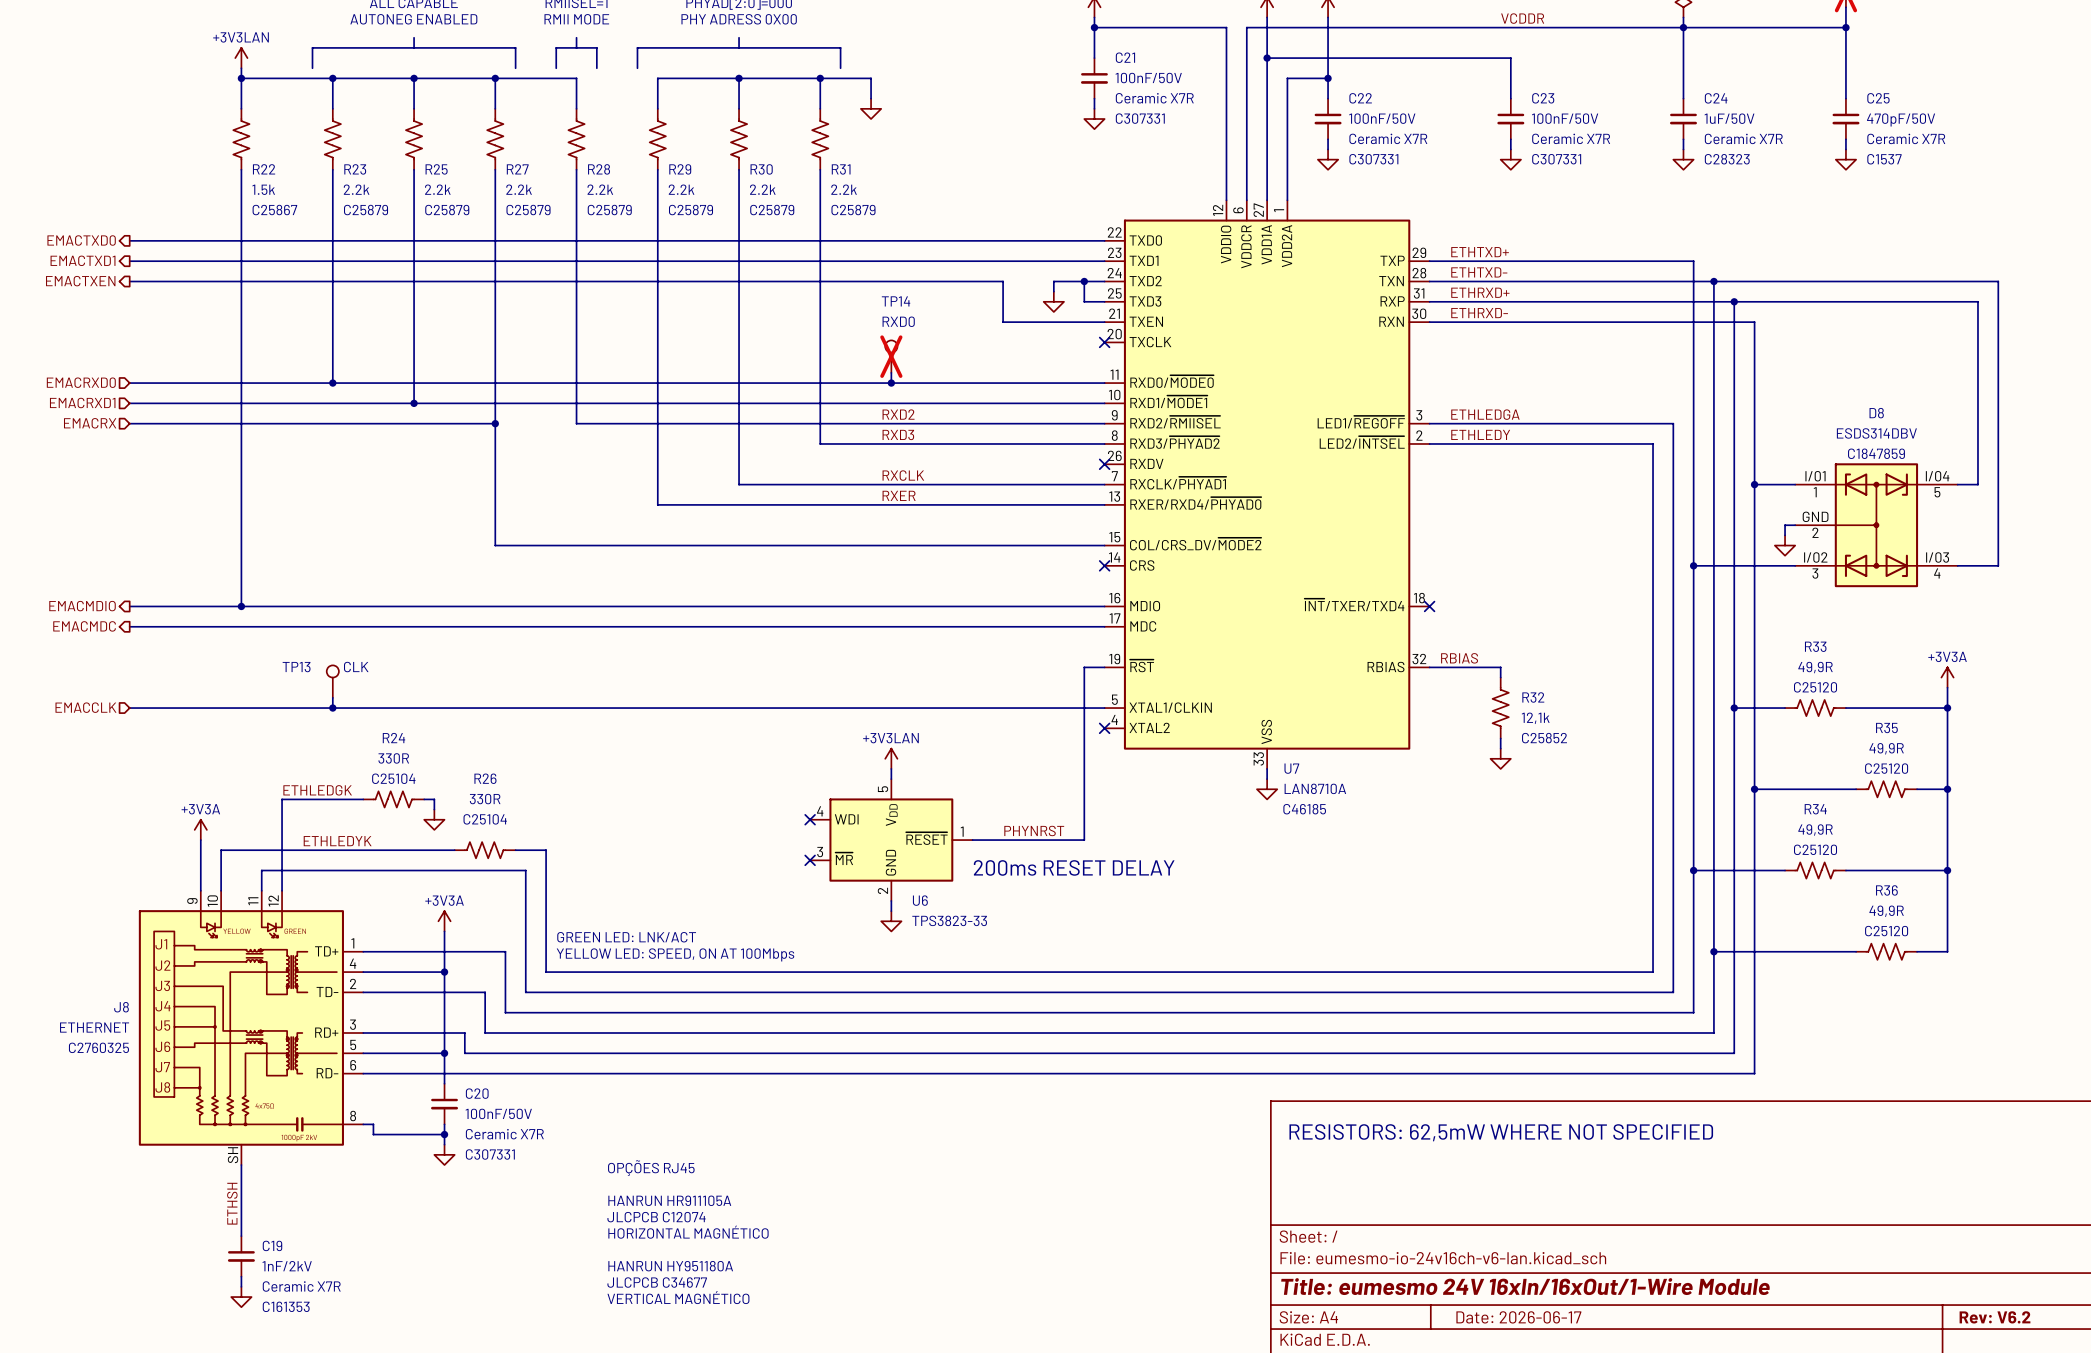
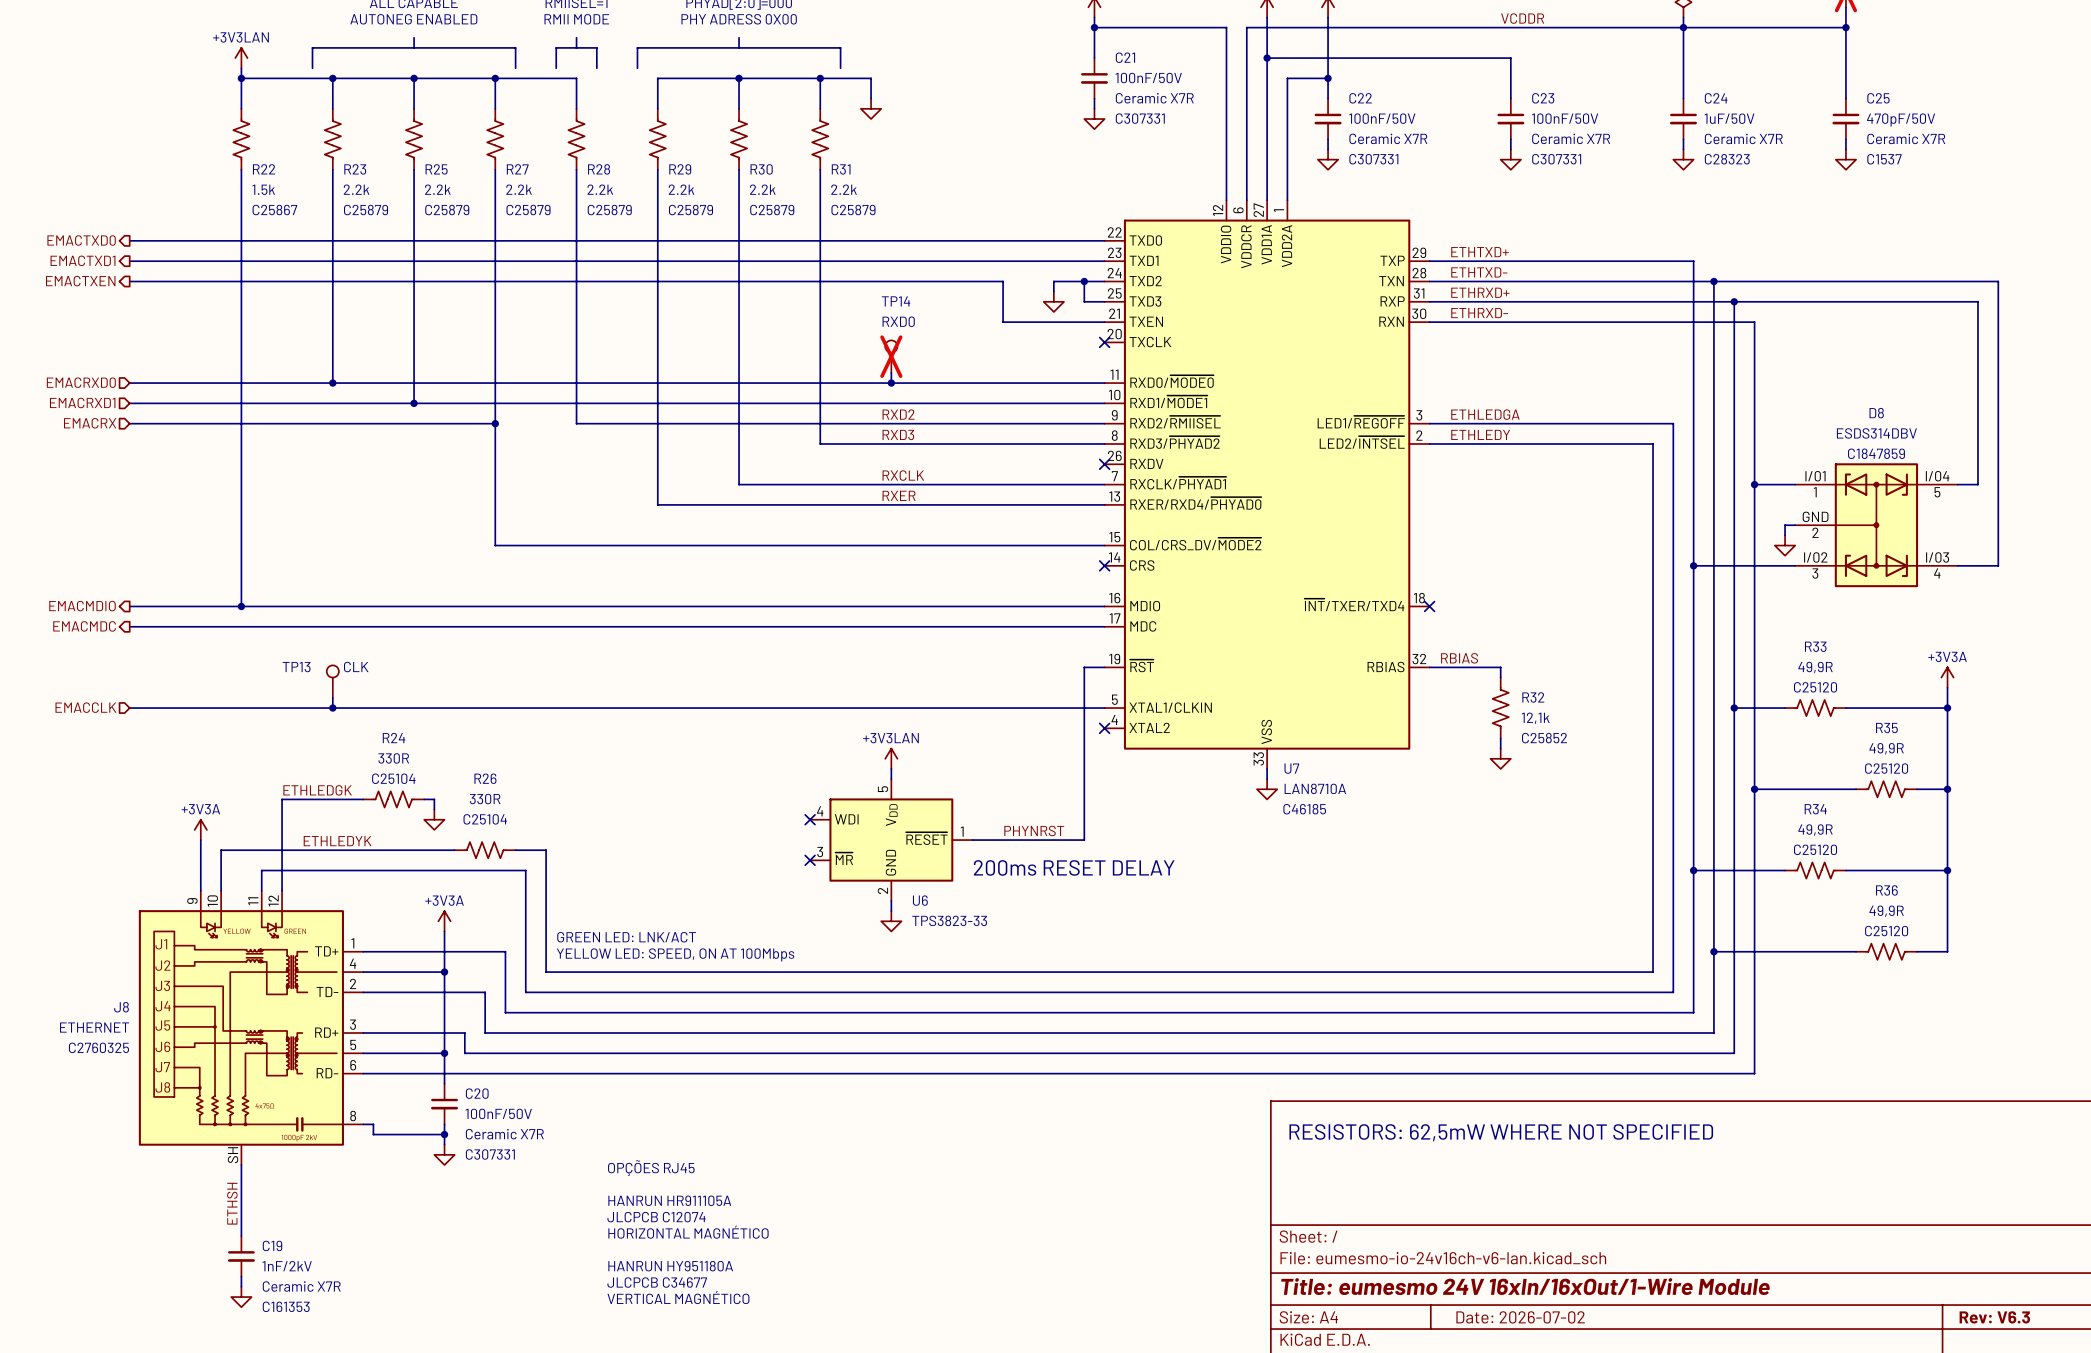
title block: Date: 2026-06-17 (1518, 1317) -> Date: 2026-07-02 (1520, 1317)
title block: Rev: V6.2 (1994, 1317) -> Rev: V6.3 (1994, 1317)

